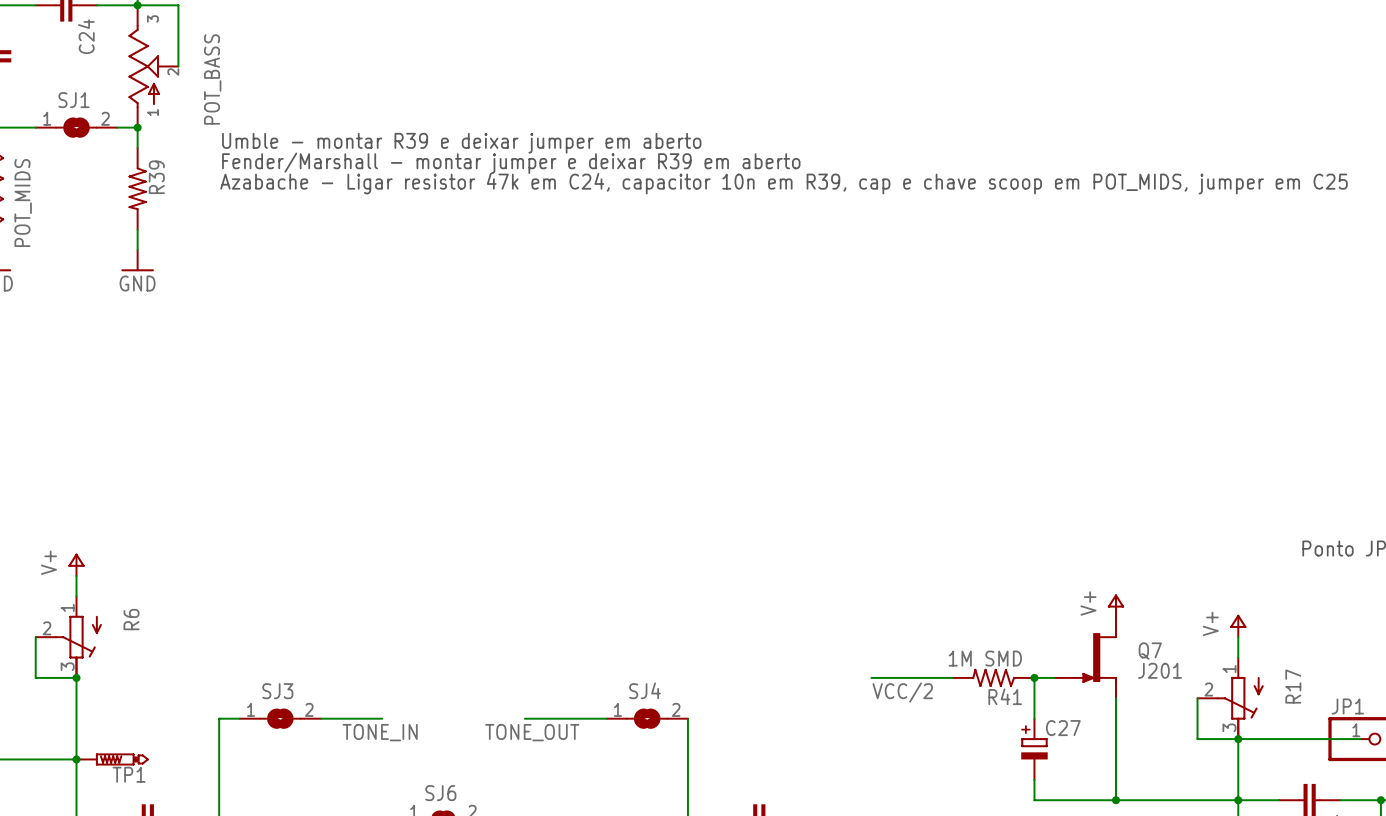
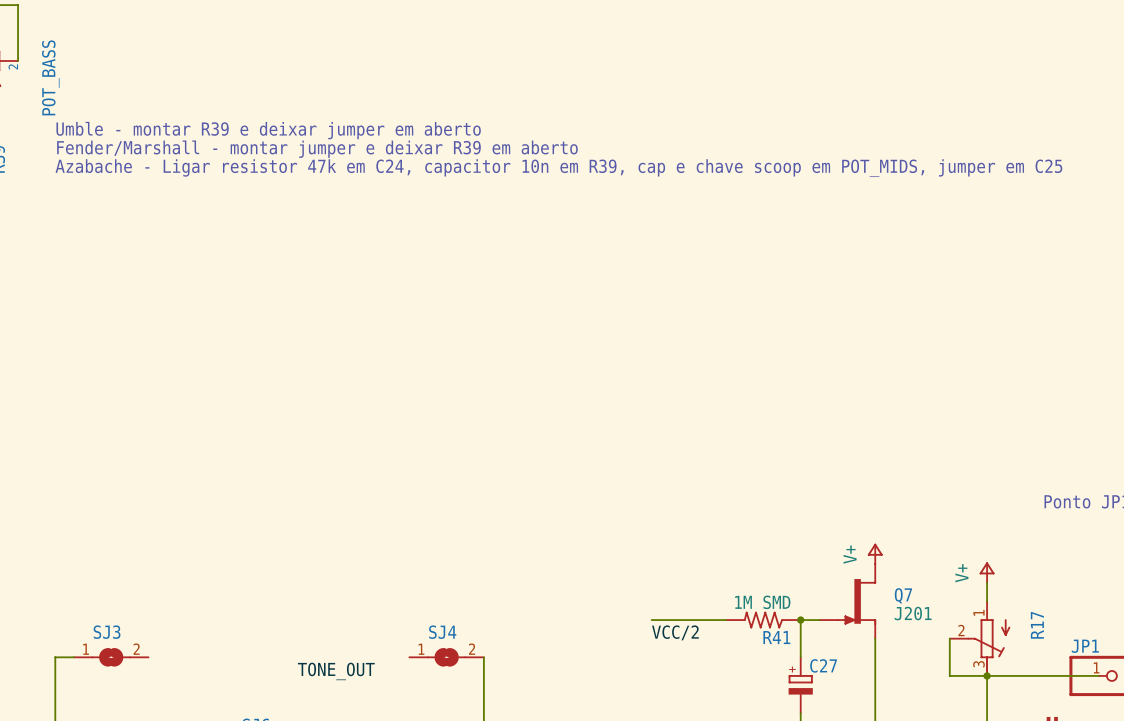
wire: (321, 718) (382, 718) -> none
wire: (524, 718) (606, 718) -> none
label: TONE_IN (380, 732) -> none

